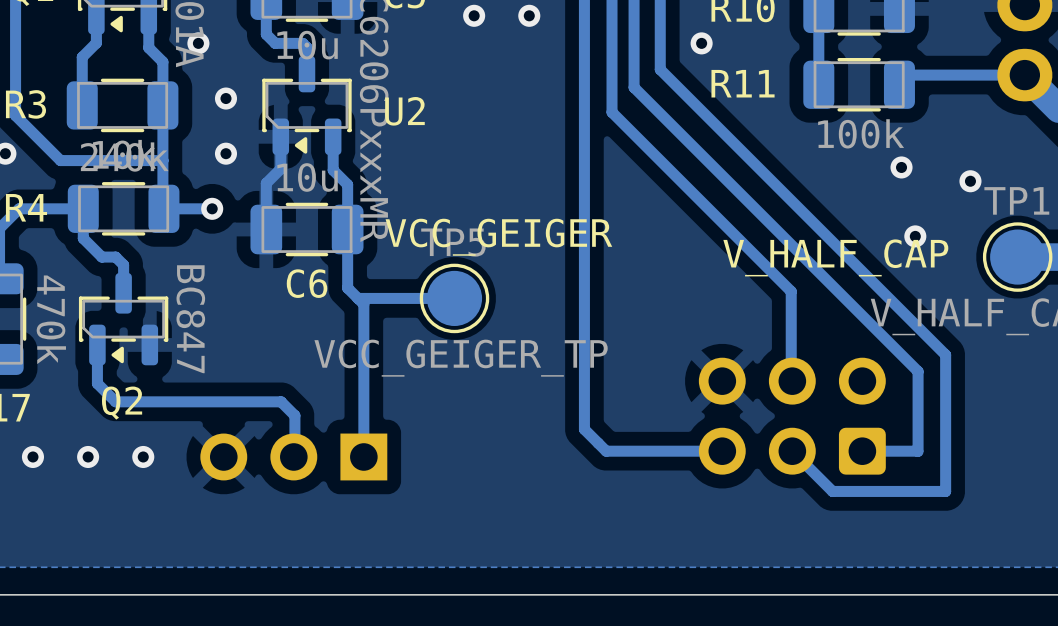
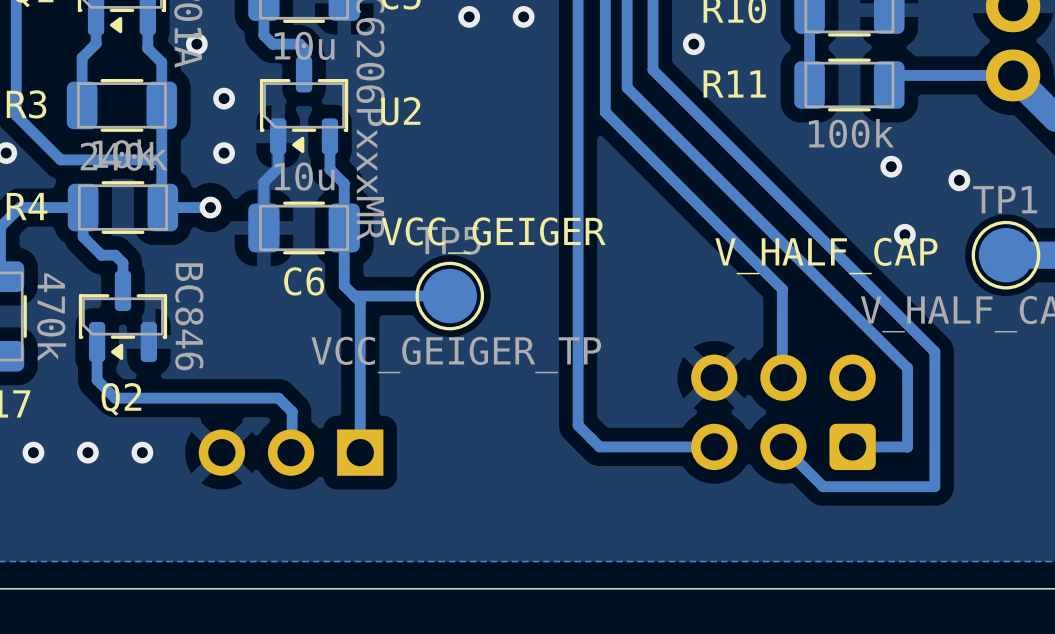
Q2 value: BC847 (190, 319) -> BC846 (189, 316)

